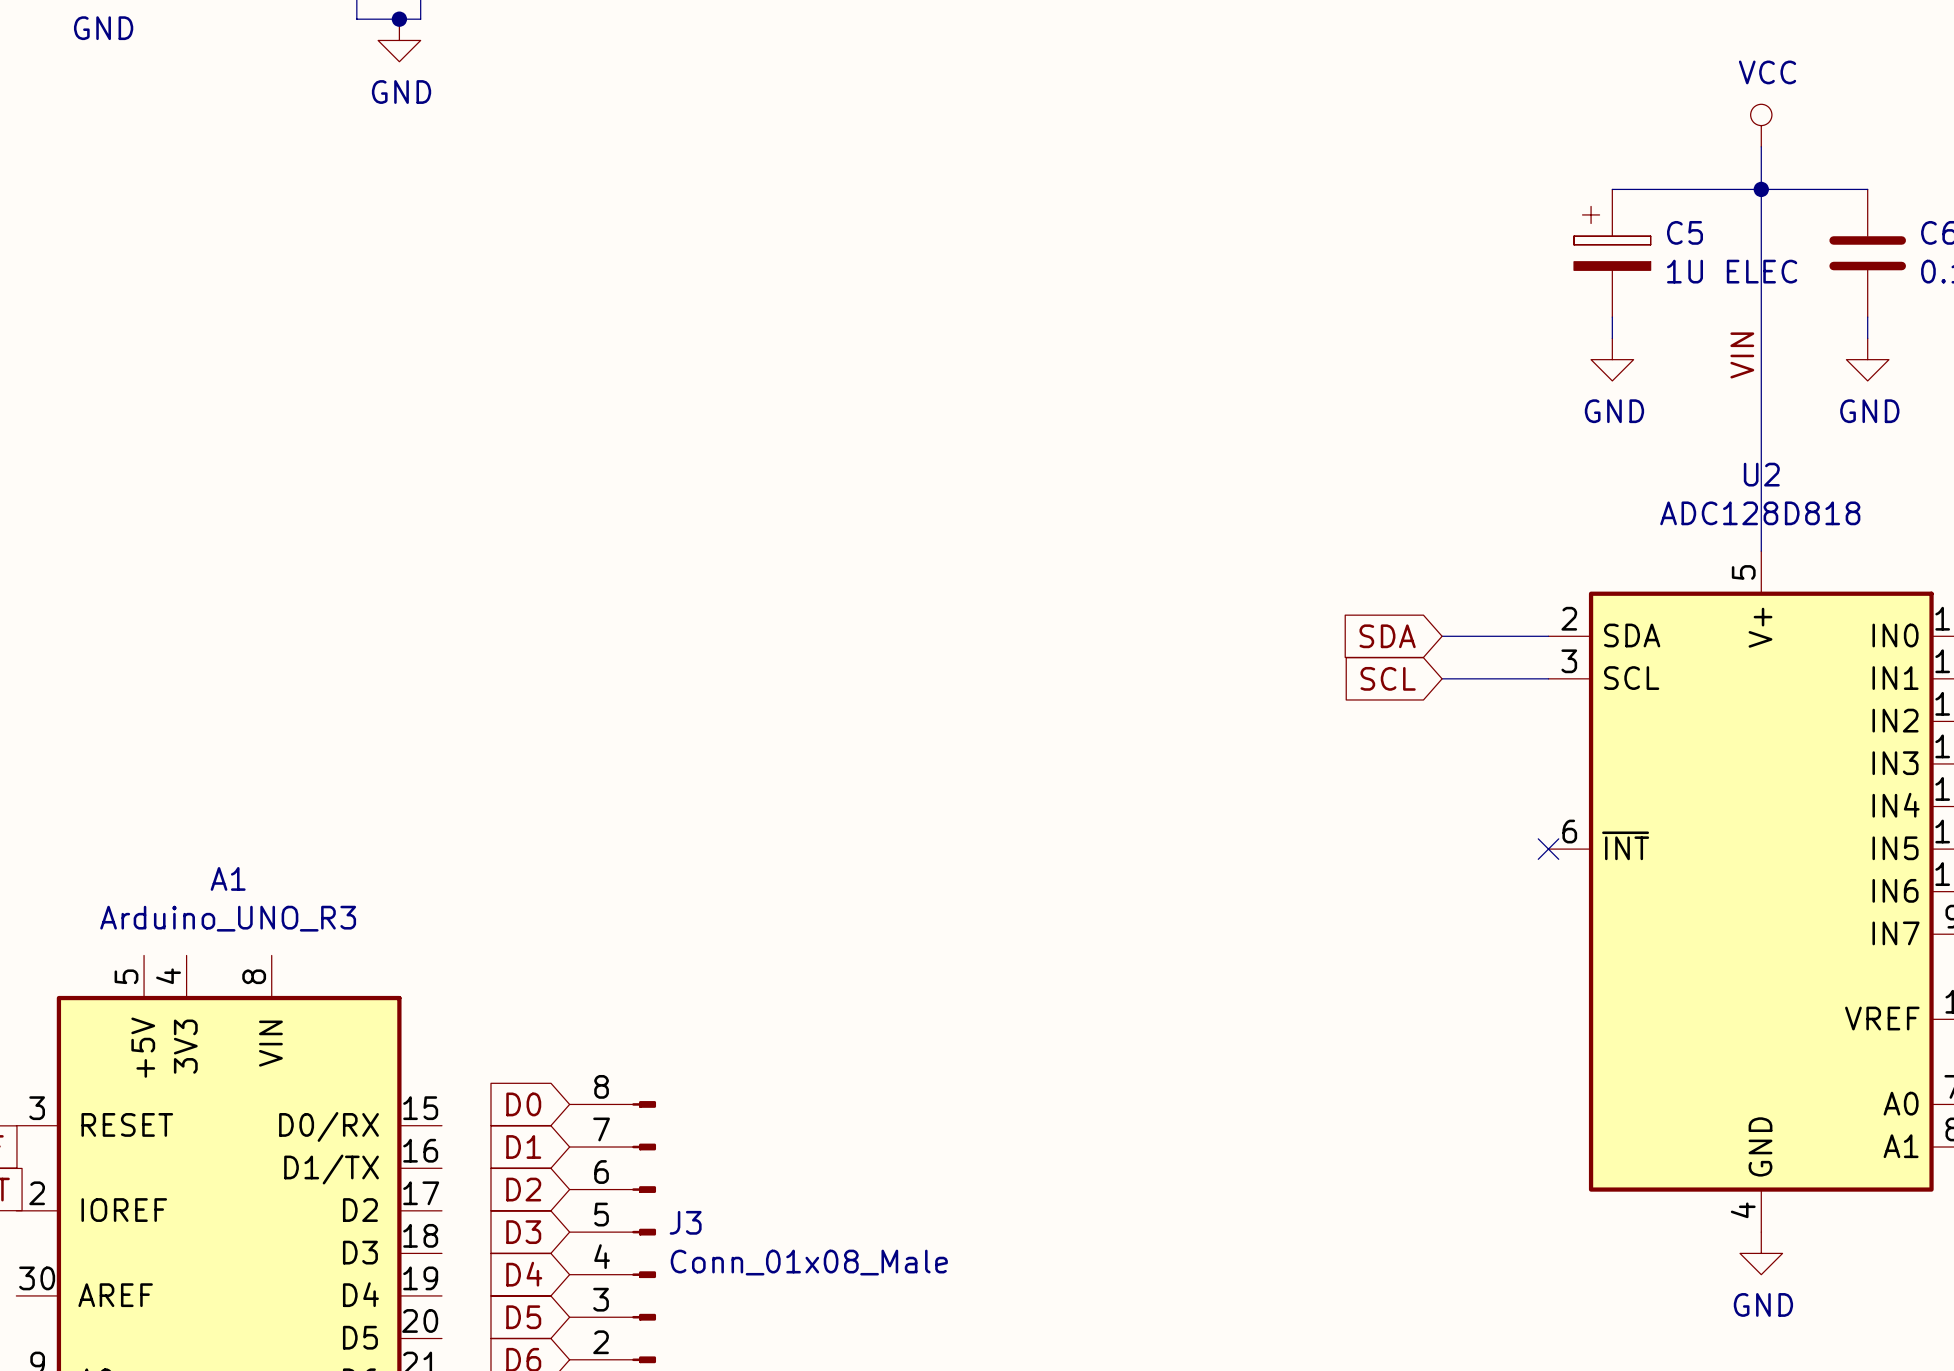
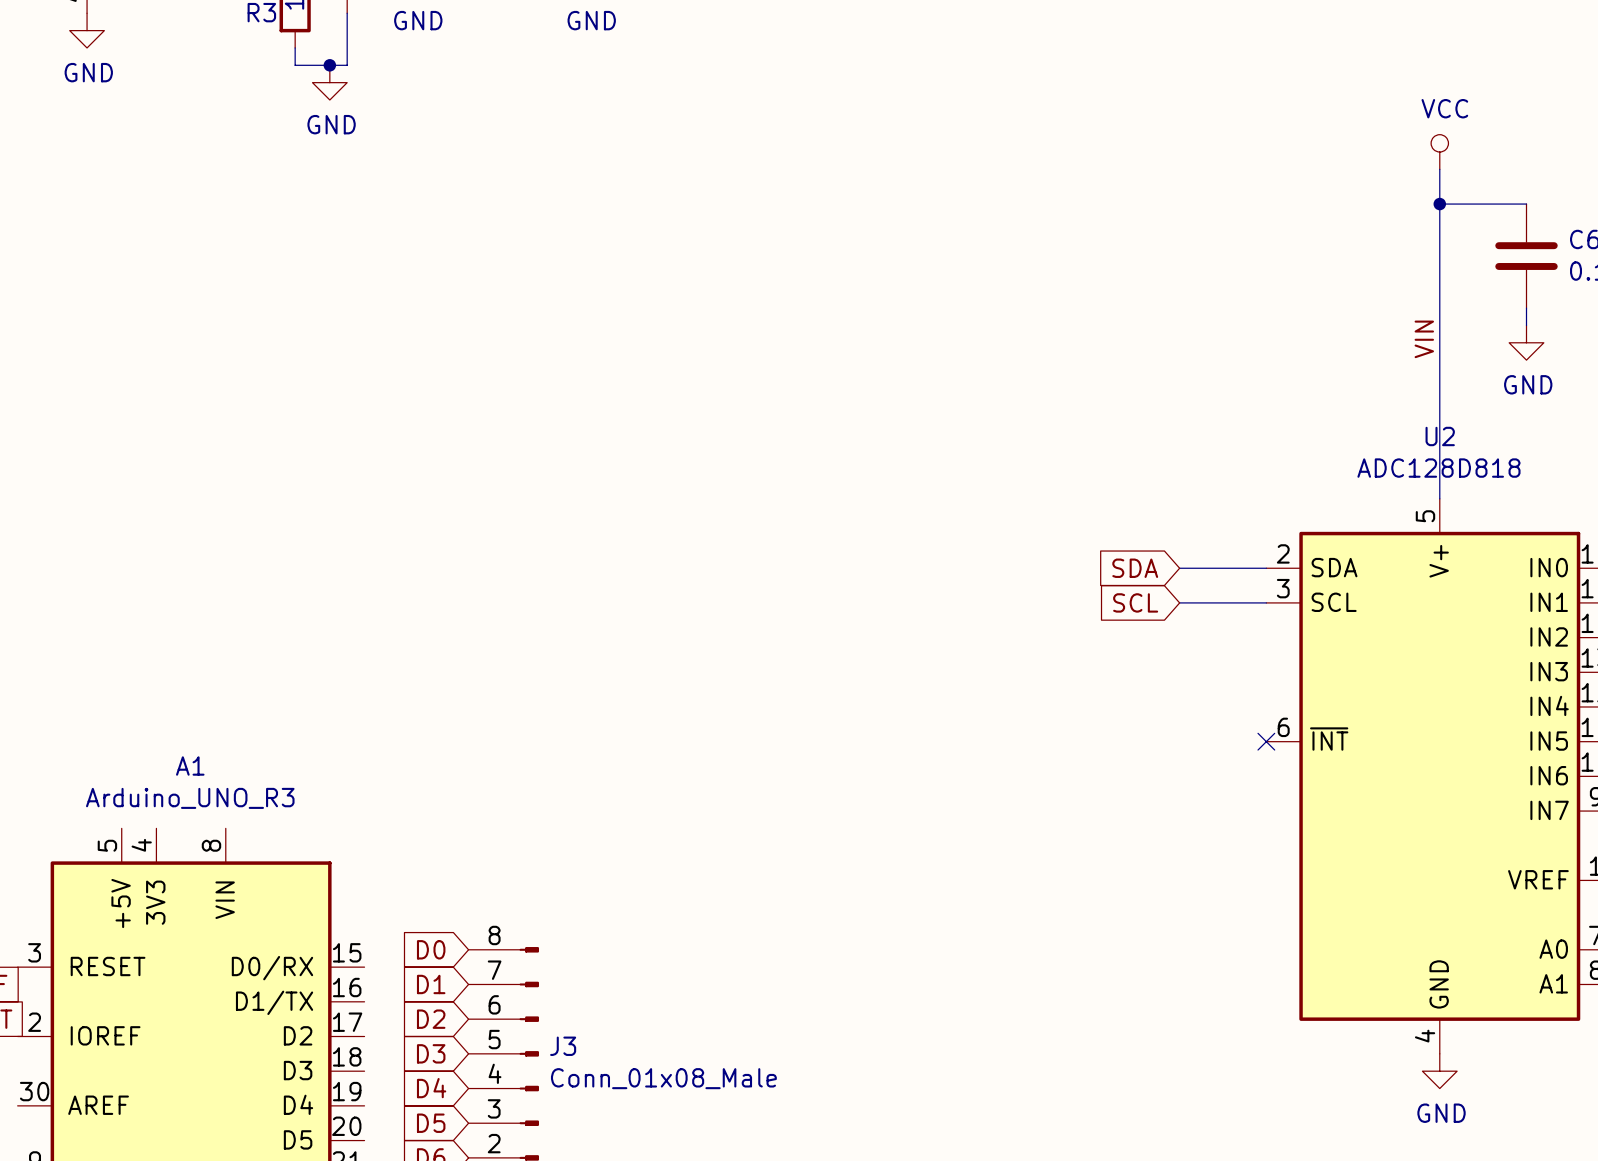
wire: (1612, 189) (1761, 189) -> none
C5: 1U ELEC (1612, 253) -> none
wire: (1612, 317) (1612, 338) -> none
power symbol: GND (1612, 359) -> none

